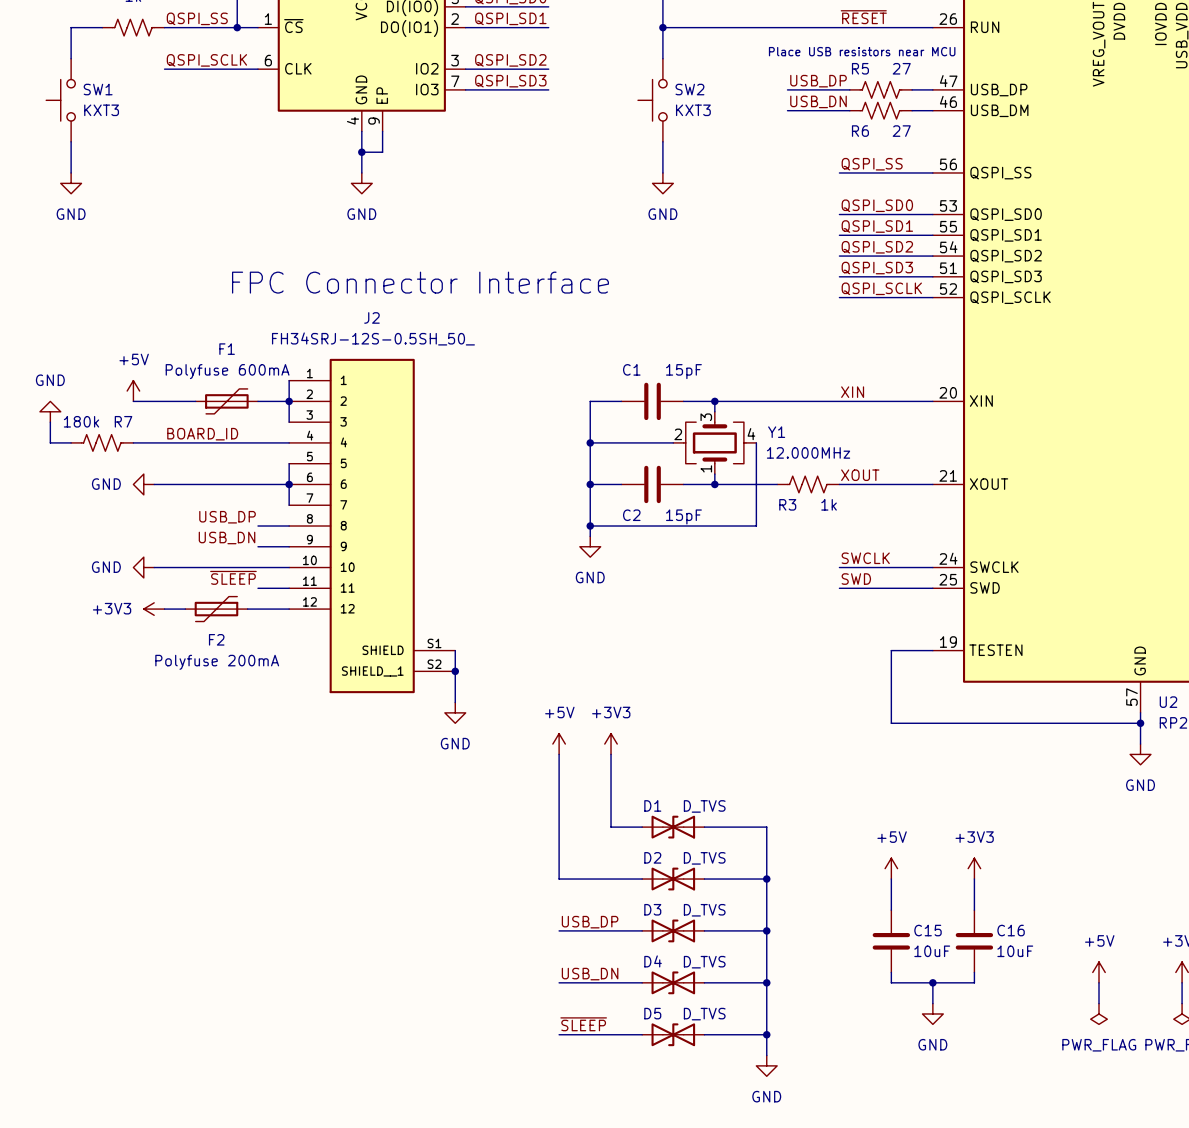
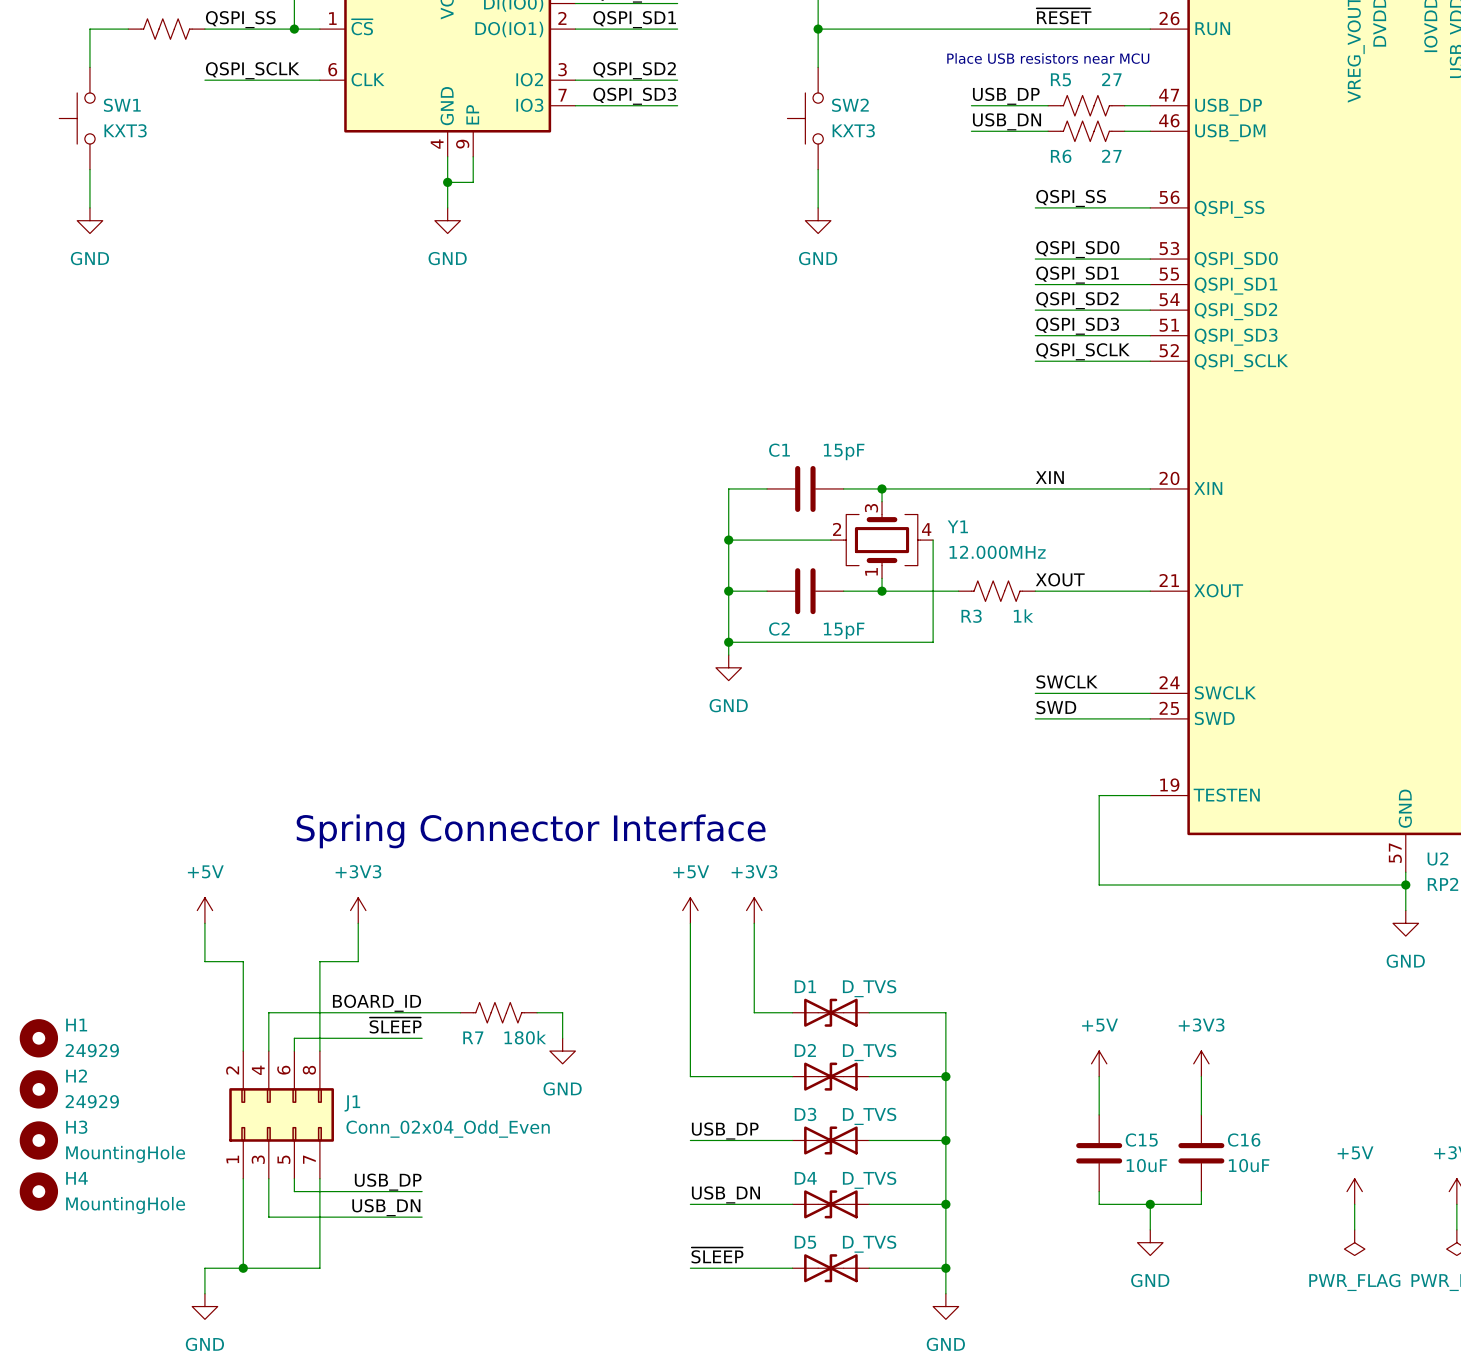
text: FPC Connector Interface (420, 282) -> none
wire: (289, 380) (289, 422) -> none
power symbol: +5V (133, 391) -> none
wire: (133, 401) (195, 401) -> none
F1: Polyfuse 600mA (226, 401) -> none
wire: (258, 401) (289, 401) -> none
junction: (289, 401) -> none
power symbol: GND (50, 411) -> none
R7 value position: 180k (81, 421) -> 180k (525, 1037)
R7 name position: R7 (123, 421) -> R7 (473, 1037)
wire: (50, 422) (50, 442) (71, 442) -> none
label: BOARD_ID (202, 434) -> none
R7 position: (102, 442) -> (498, 1012)
wire: (133, 442) (289, 442) -> none
wire: (289, 463) (289, 505) -> none
power symbol: GND (143, 484) -> none
wire: (154, 484) (289, 484) -> none
junction: (289, 484) -> none
label: USB_DP (227, 517) -> none
wire: (258, 526) (289, 526) -> none
J2: FH34SRJ-12S-0.5SH_50_ (372, 526) -> none
label: USB_DN (227, 537) -> none
wire: (258, 546) (289, 546) -> none
power symbol: GND (143, 567) -> none
wire: (154, 567) (289, 567) -> none
label: ~{SLEEP} (233, 577) -> none
wire: (258, 588) (289, 588) -> none
power symbol rotation: 0° (154, 609) -> 90° clockwise (358, 910)
power symbol position: +3V3 (154, 609) -> +3V3 (358, 910)
wire: (164, 609) (185, 609) -> none
F2: Polyfuse 200mA (216, 609) -> none
wire: (247, 609) (289, 609) -> none
wire: (455, 650) (455, 702) -> none
junction: (455, 671) -> none
text: none -> Spring Connector Interface (531, 831)
power symbol position: GND (455, 712) -> GND (562, 1051)
power symbol: none -> +5V (204, 910)
wire: none -> (204, 923) (204, 961) (243, 961) (243, 1051)
wire: none -> (358, 923) (358, 961) (319, 961) (319, 1051)
label: none -> BOARD_ID (377, 1003)
wire: none -> (460, 1012) (268, 1012) (268, 1051)
wire: none -> (537, 1012) (562, 1012) (562, 1038)
label: none -> ~{SLEEP} (395, 1025)
H1: none -> 24929 (38, 1038)
wire: none -> (422, 1038) (294, 1038) (294, 1051)
H2: none -> 24929 (38, 1089)
J1: none -> Conn_02x04_Odd_Even (281, 1114)
H3: none -> MountingHole (38, 1140)
wire: none -> (243, 1178) (243, 1268)
wire: none -> (268, 1178) (268, 1217) (422, 1217)
wire: none -> (294, 1178) (294, 1191) (422, 1191)
wire: none -> (319, 1178) (319, 1268) (204, 1268) (204, 1293)
label: none -> USB_DP (388, 1182)
H4: none -> MountingHole (38, 1191)
label: none -> USB_DN (386, 1207)
junction: none -> (243, 1268)
power symbol: none -> GND (204, 1306)

